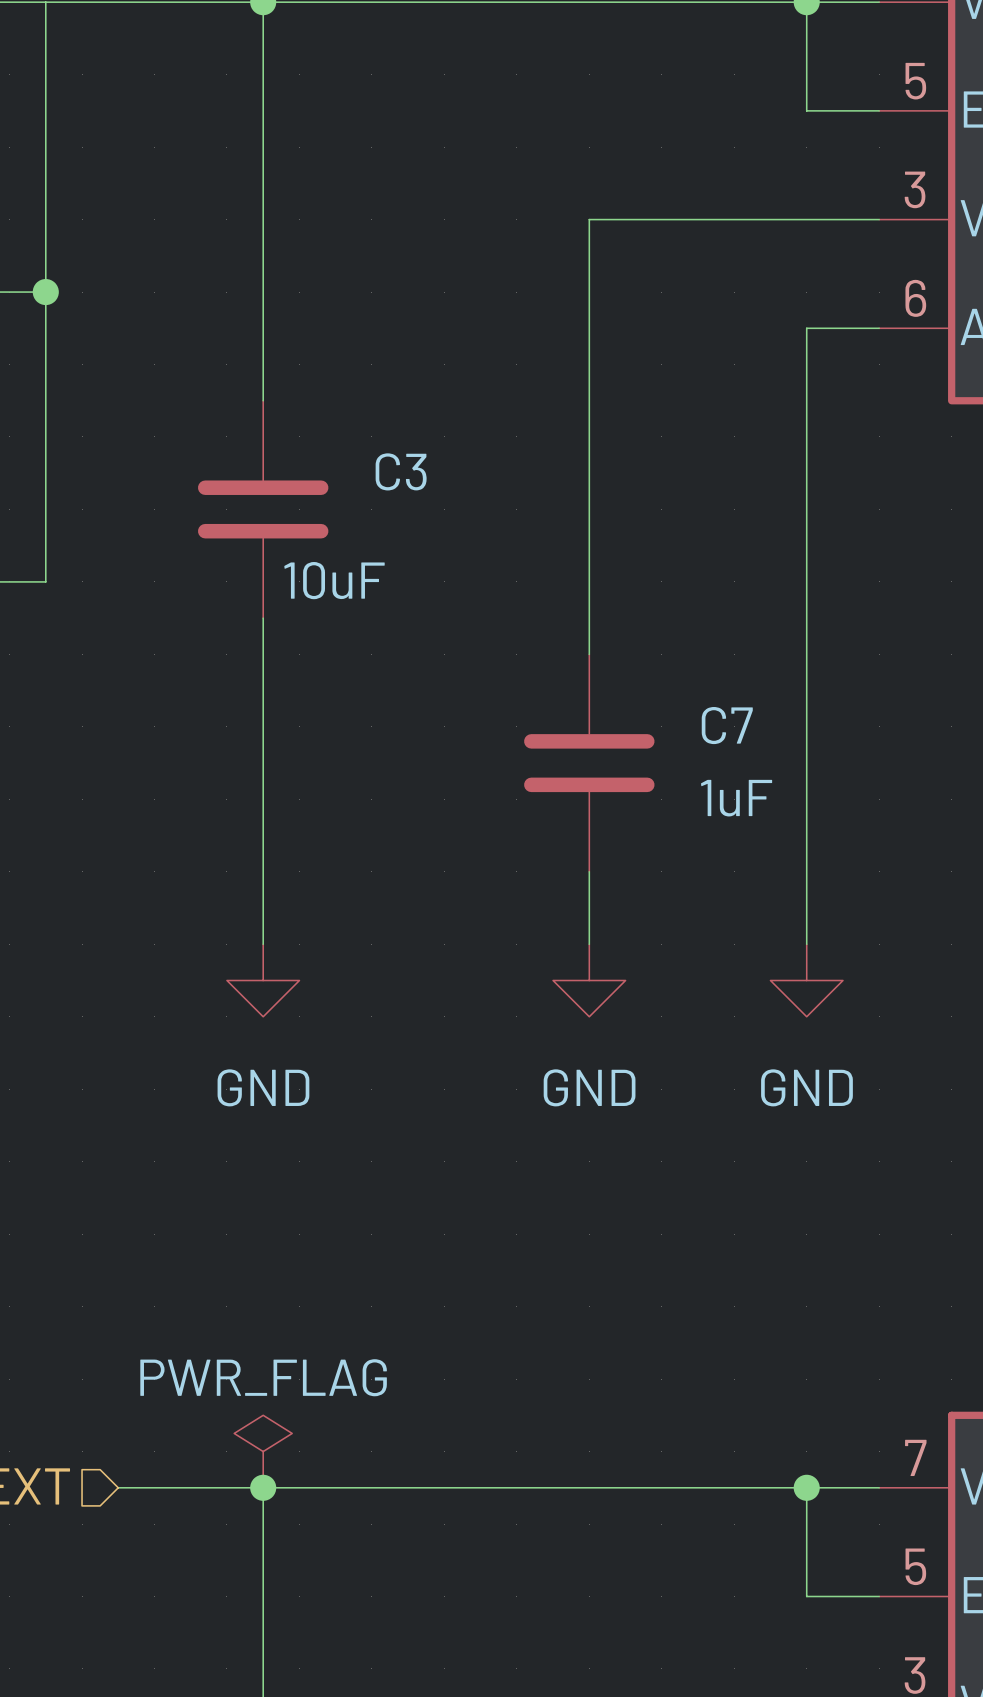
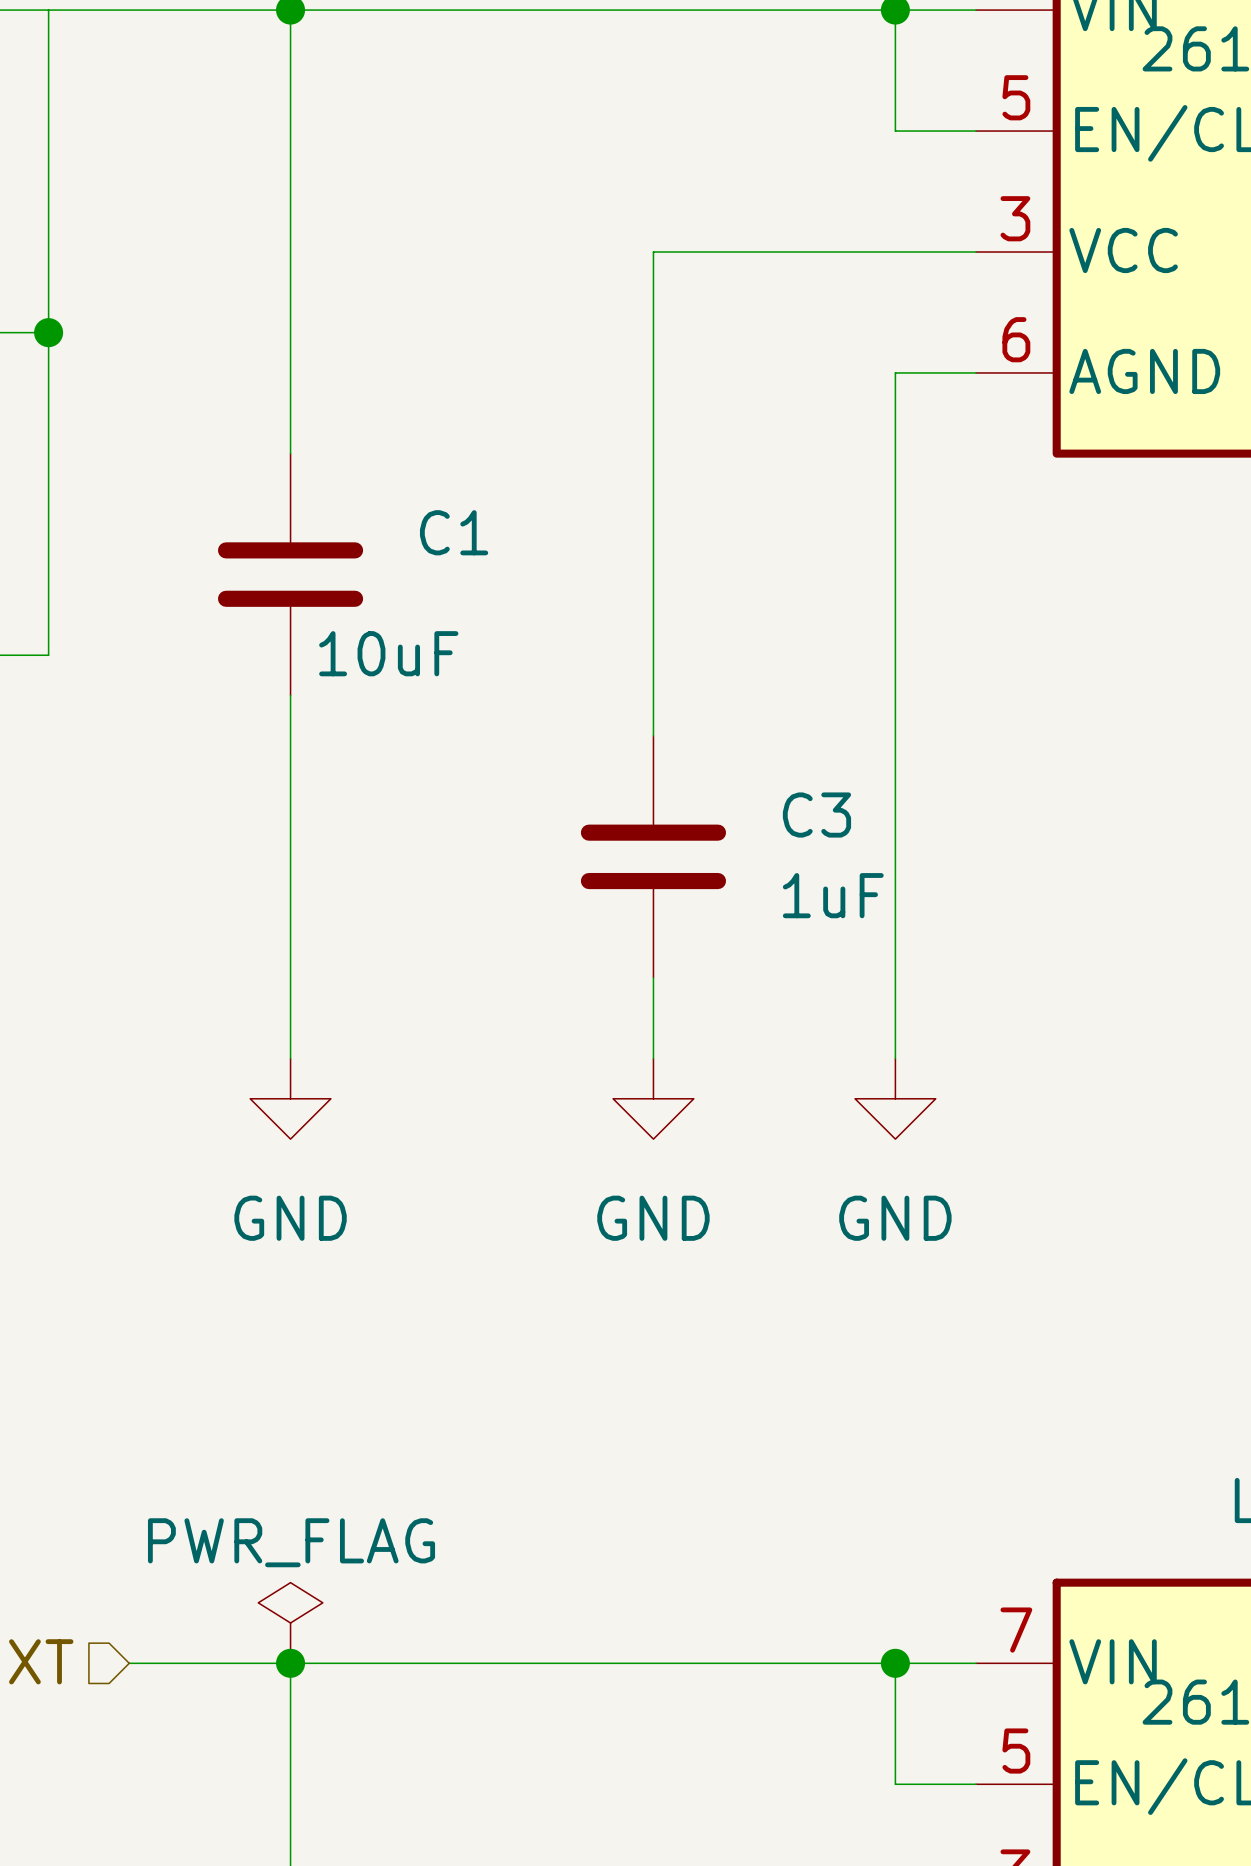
C3 name: C3 (401, 471) -> C1 (454, 532)
C7 name: C7 (727, 725) -> C3 (816, 815)

